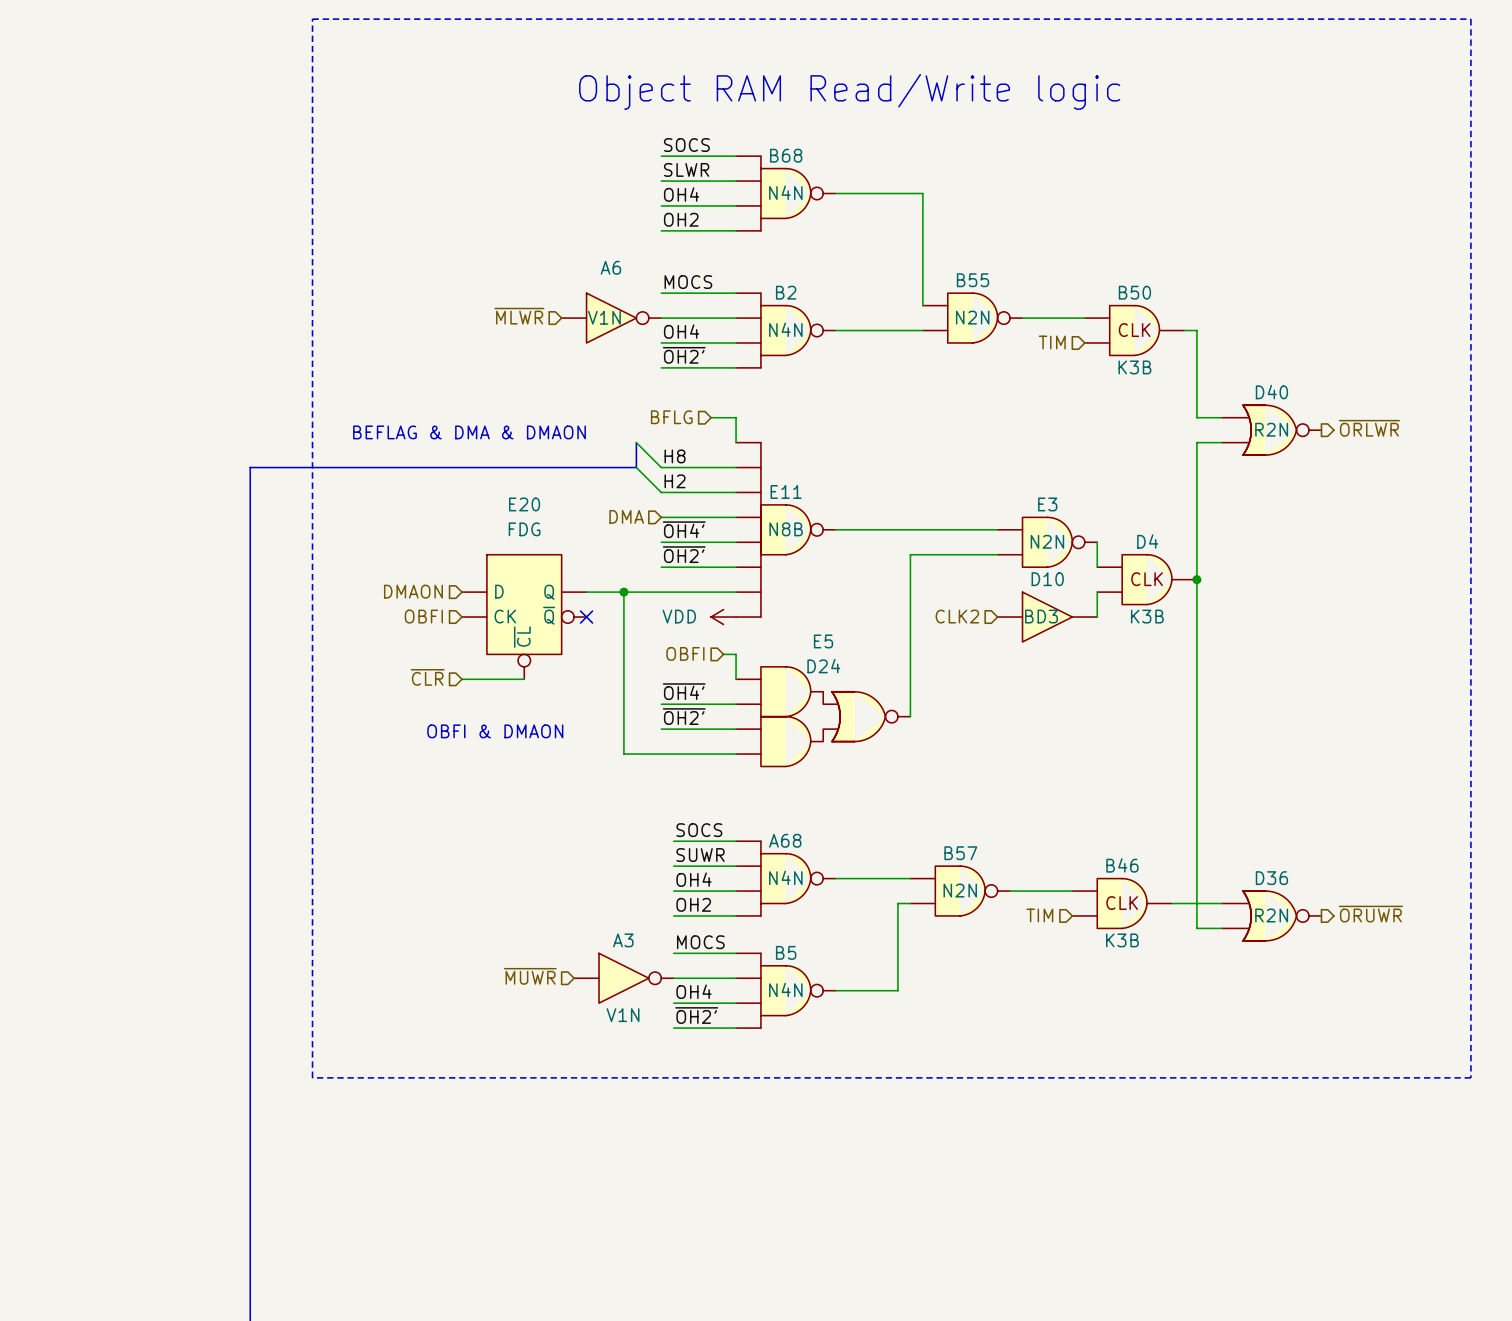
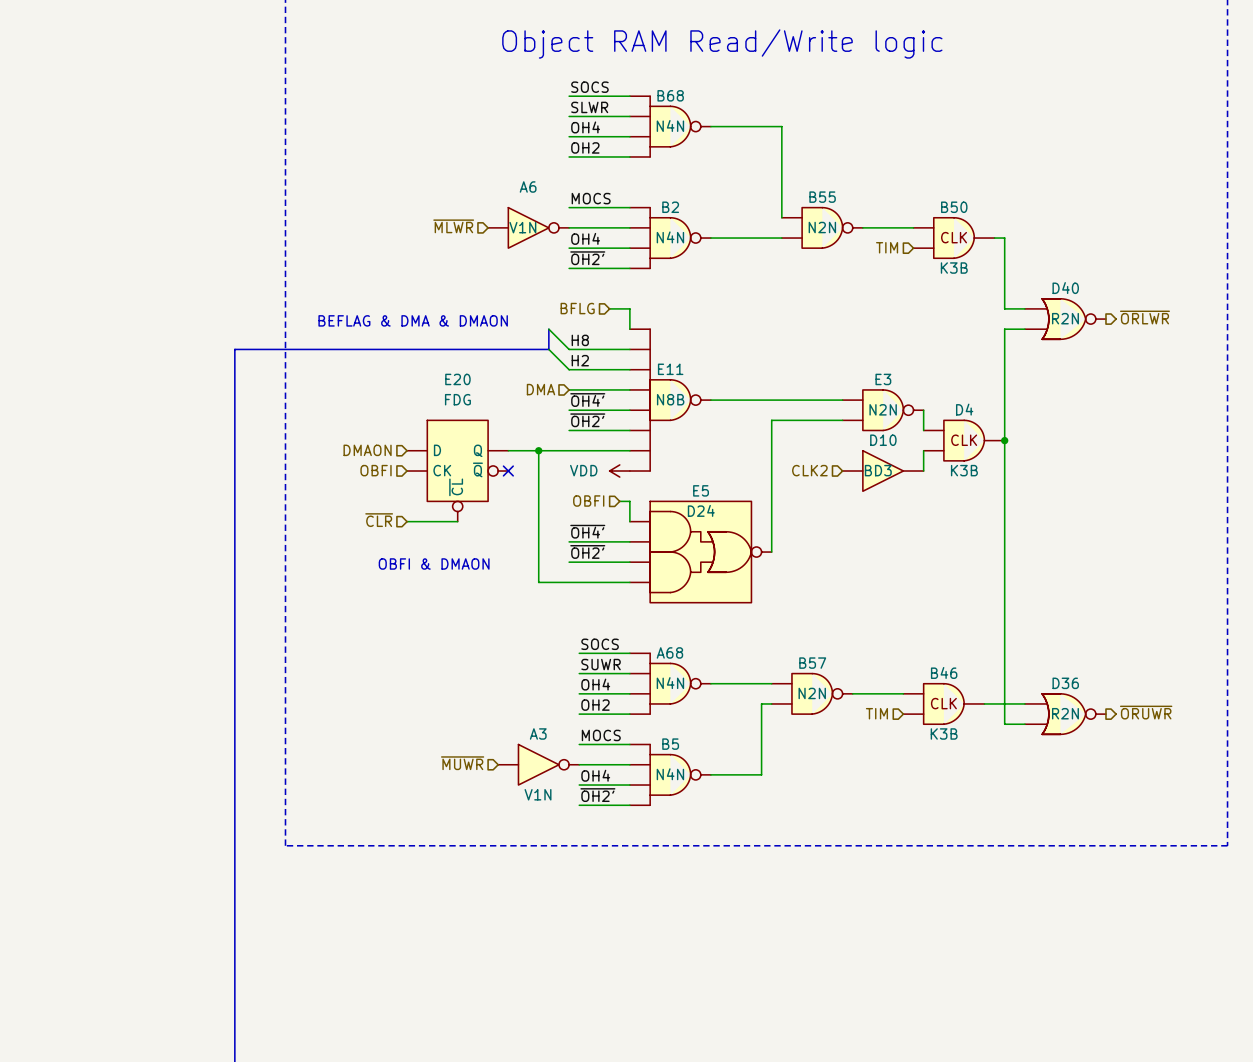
E5 symbol: [736, 666, 911, 767] -> [629, 501, 772, 603]

